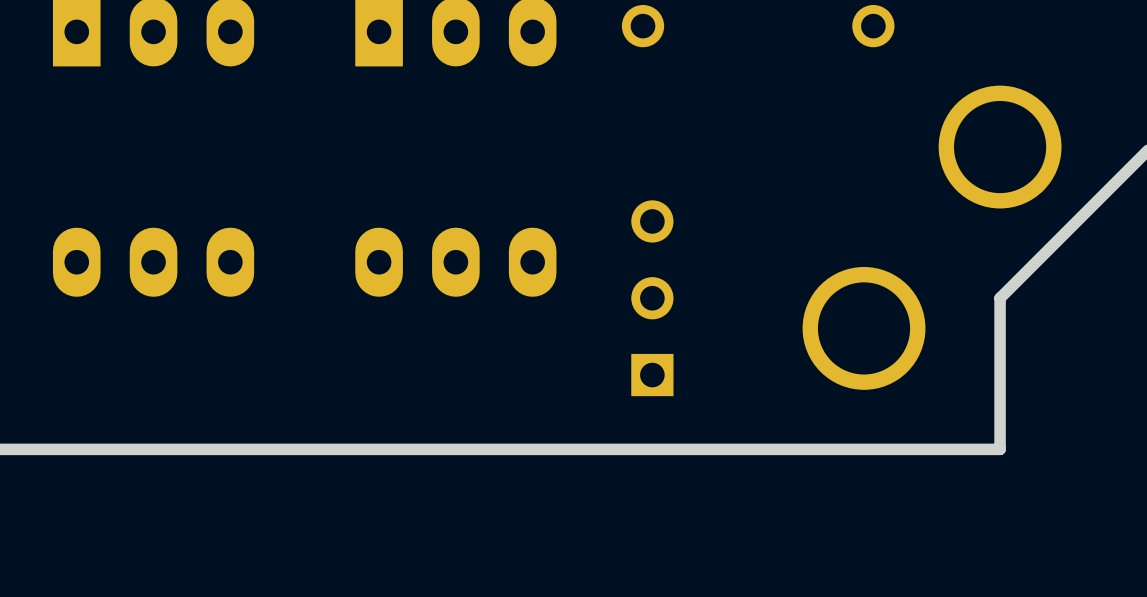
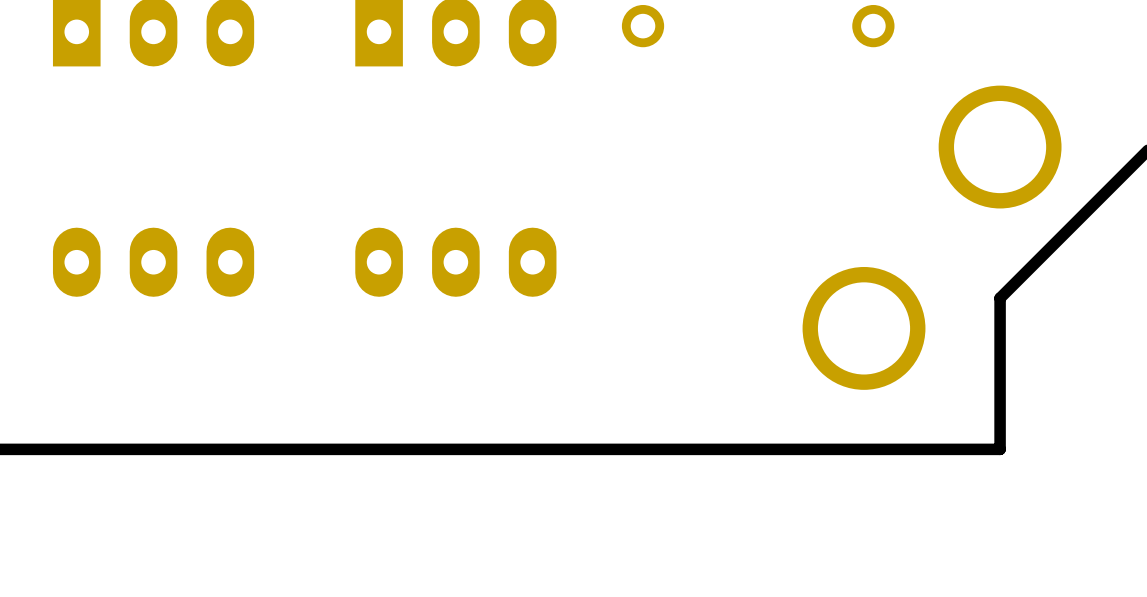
part: (652, 298) -> none

